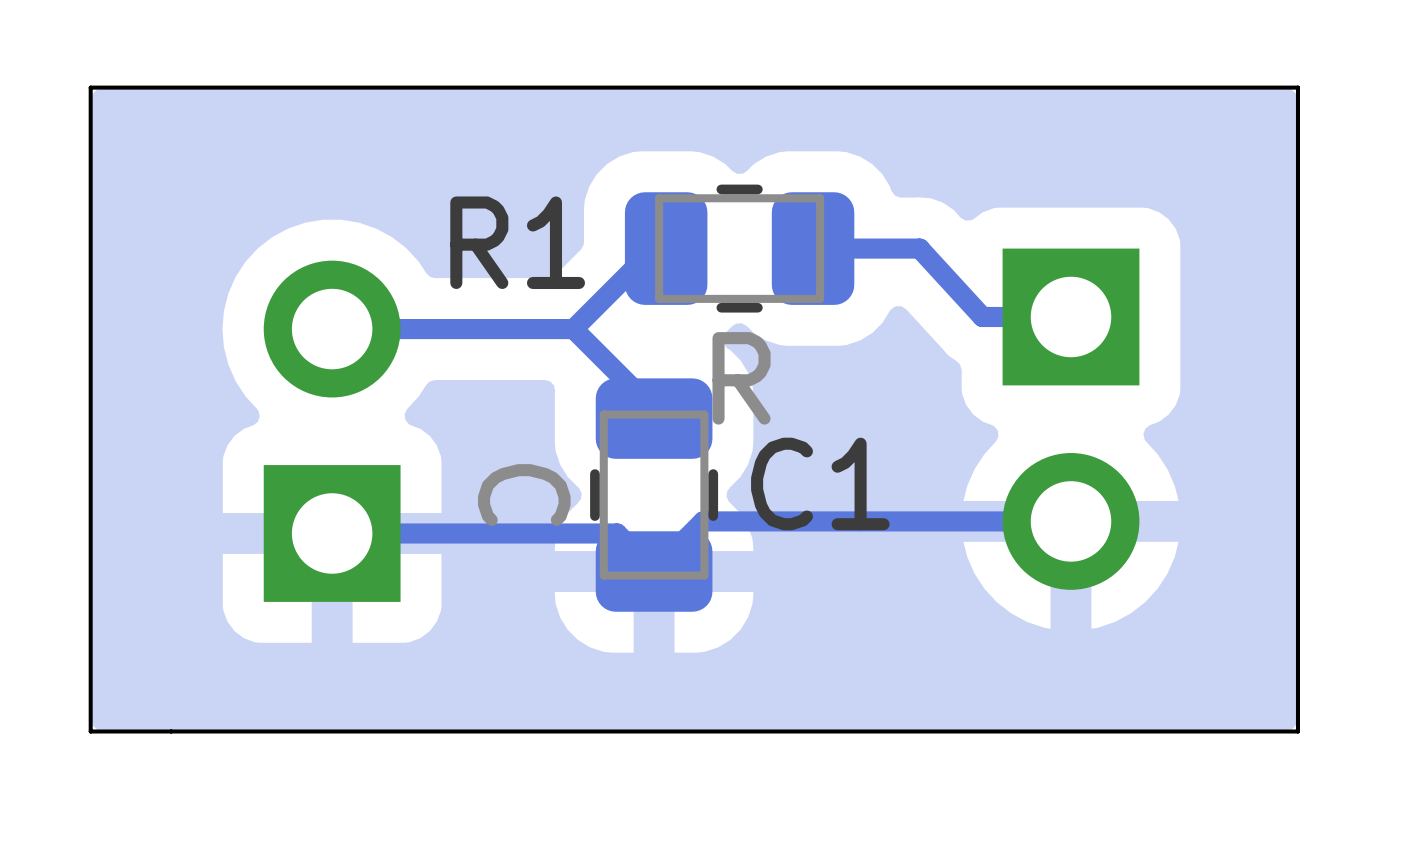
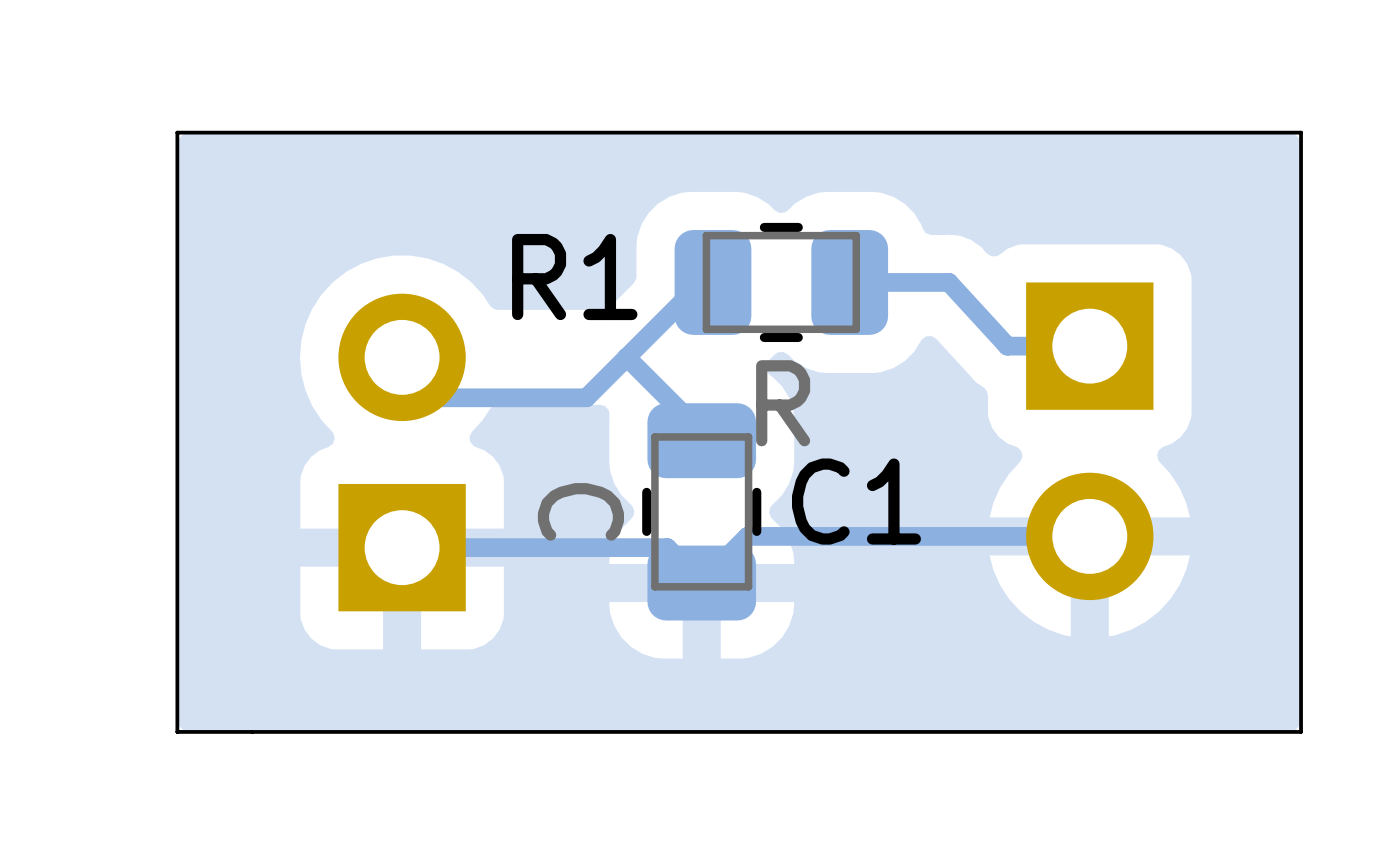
track: (573, 329) (332, 329) -> (626, 357) (586, 397) (442, 397) (402, 357)

